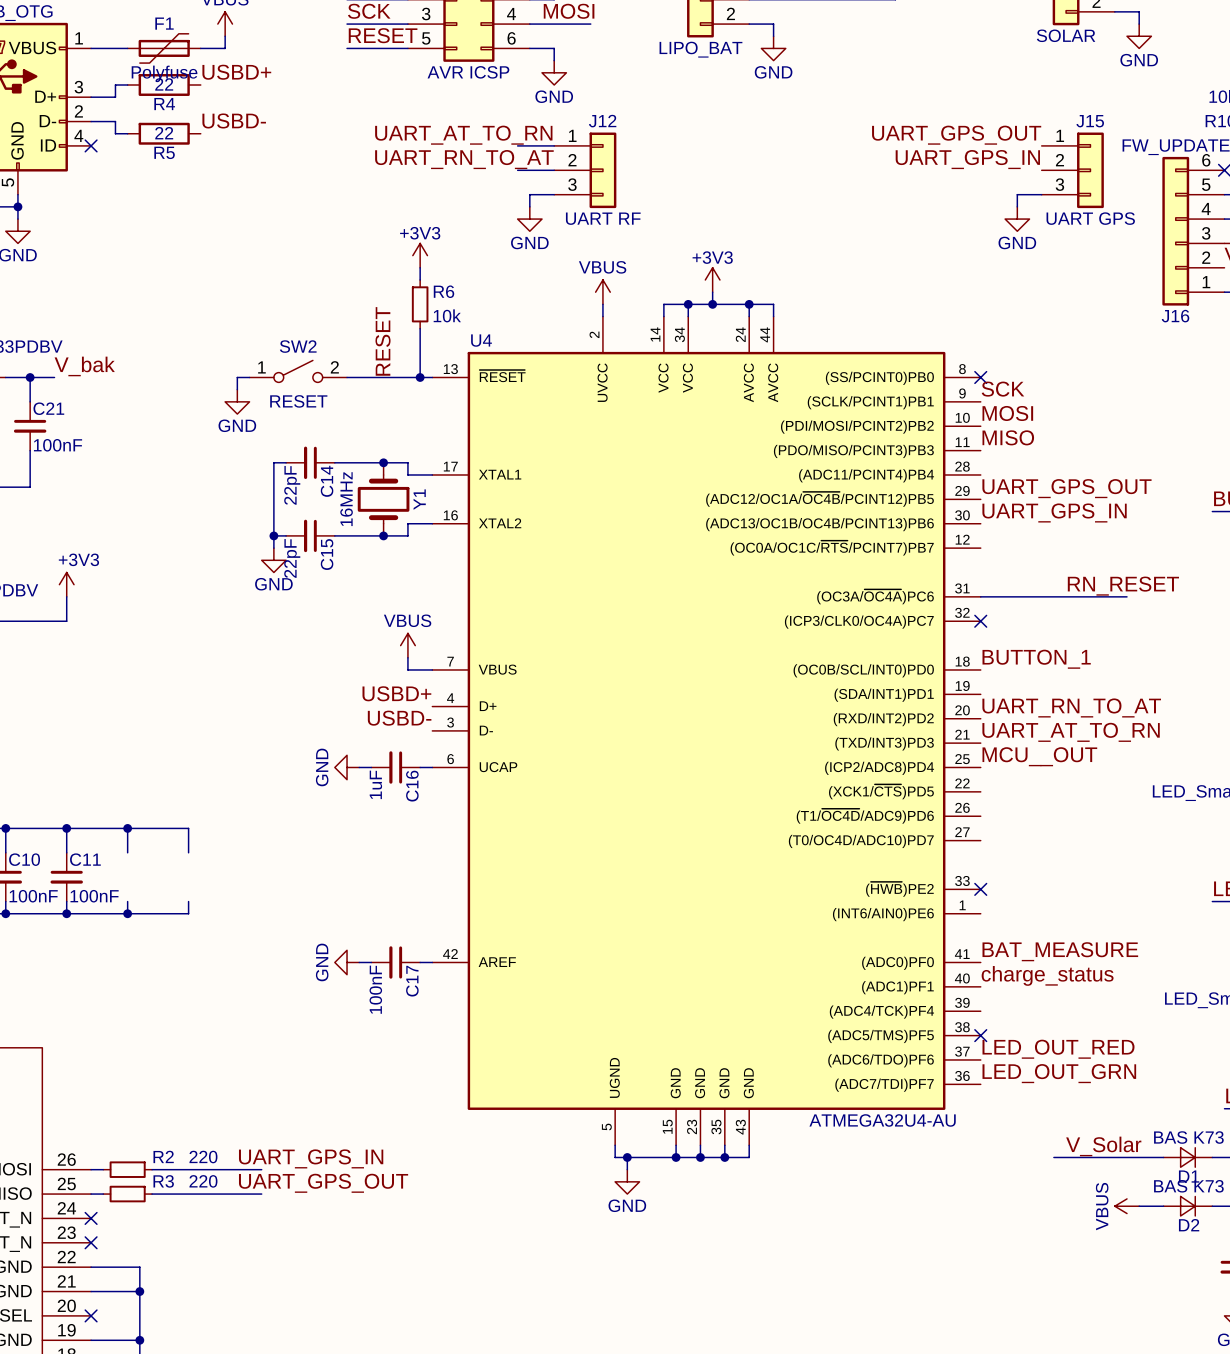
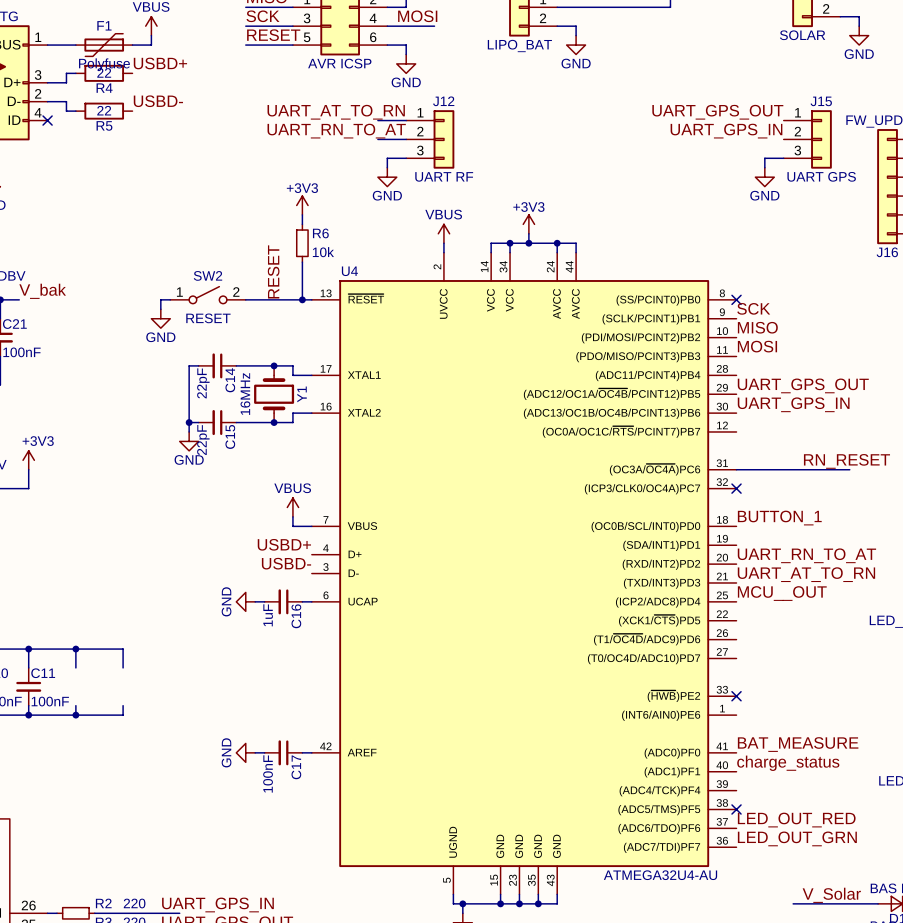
label: MOSI (1007, 413) -> MISO (757, 327)
label: MISO (1008, 437) -> MOSI (757, 346)

